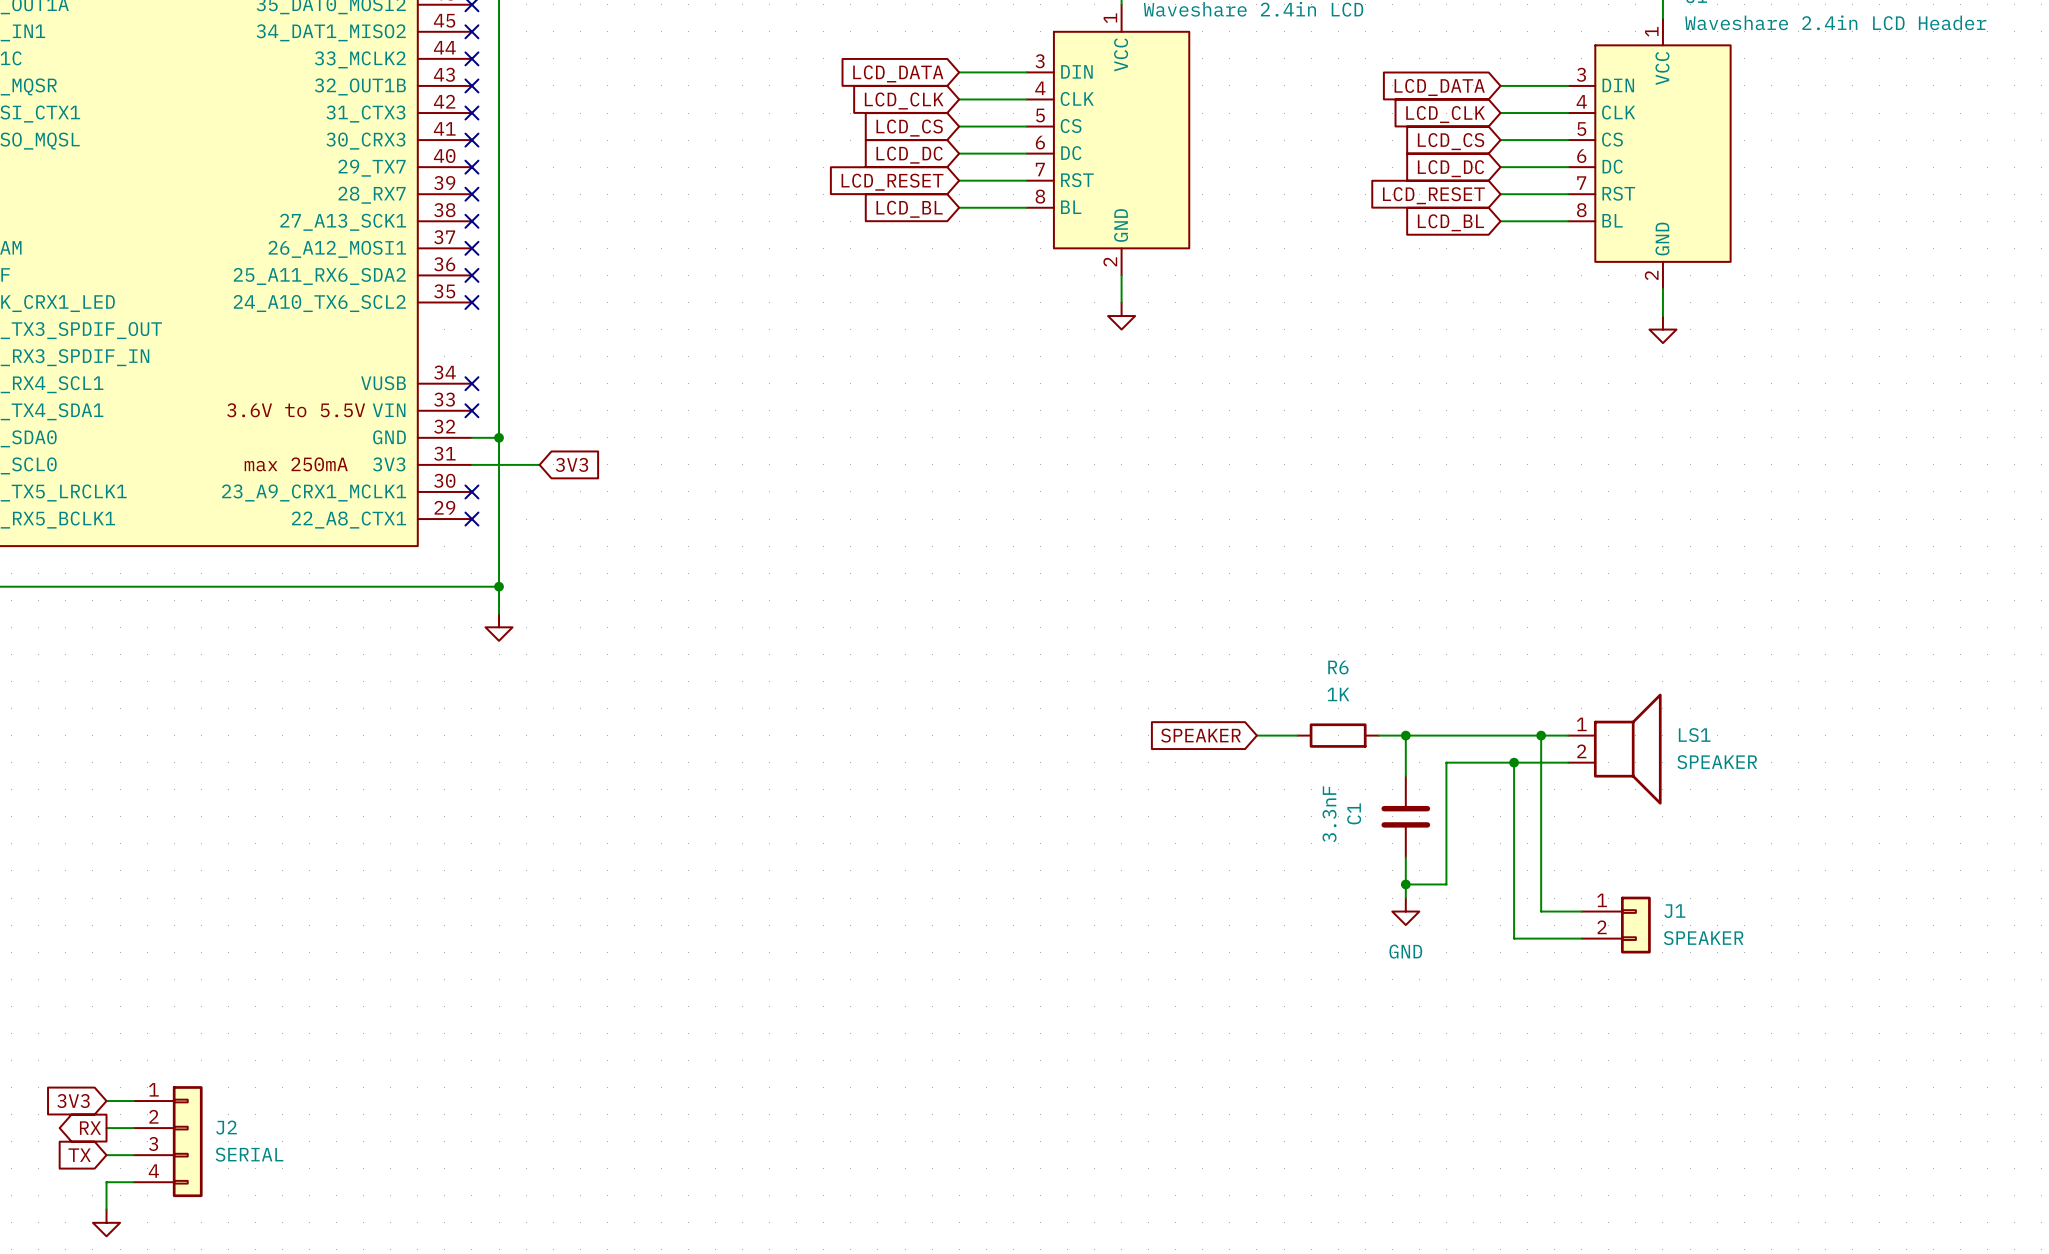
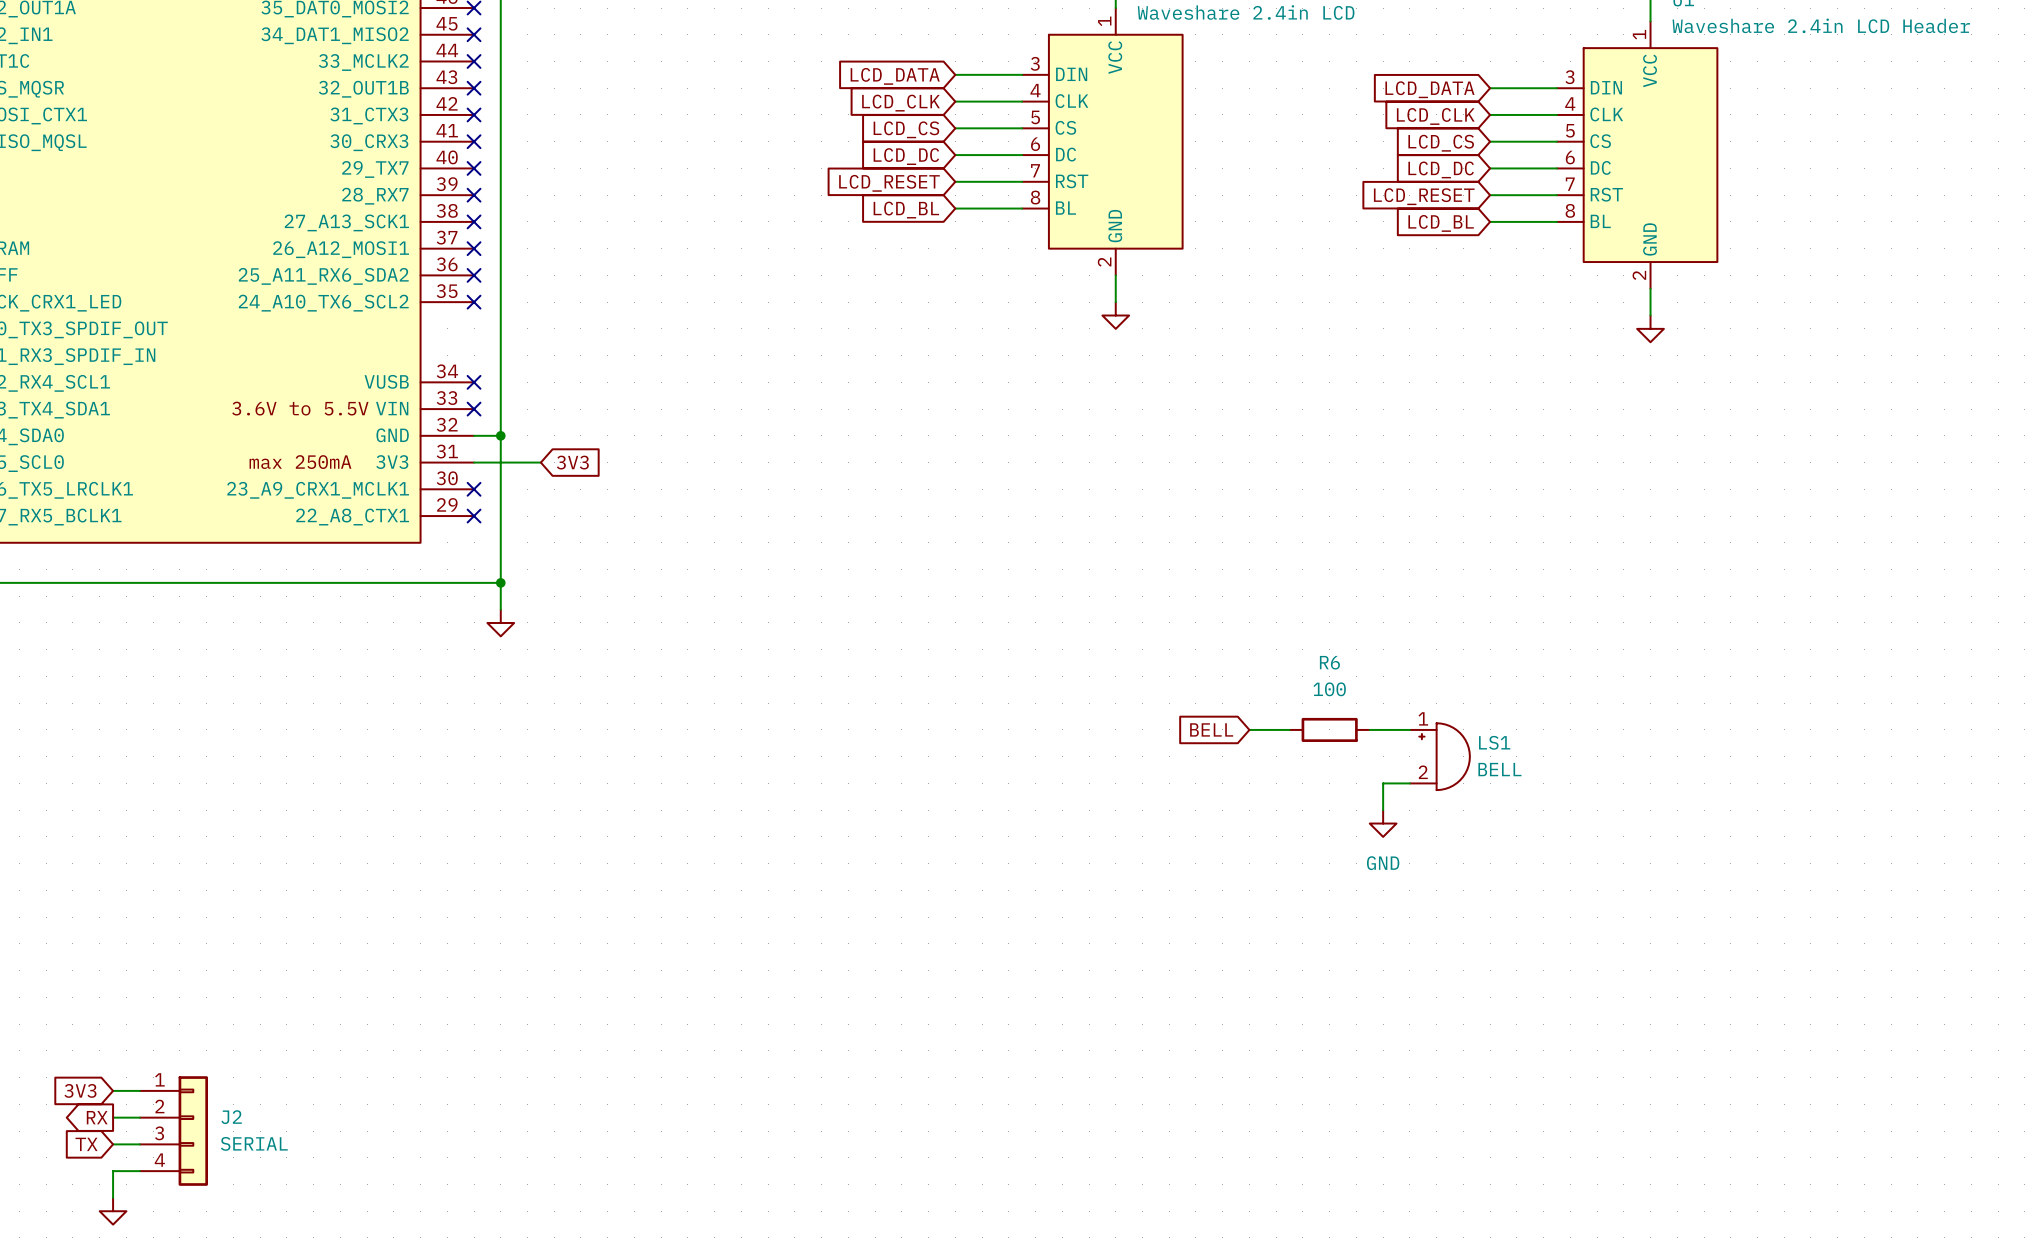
LS1 symbol: [1568, 693, 1662, 805] -> [1409, 723, 1470, 791]
R6 value: 1K (1338, 694) -> 100 (1329, 689)
global label: SPEAKER (1200, 735) -> BELL (1211, 729)
wire: (1405, 735) (1405, 776) -> none
junction: (1405, 735) -> none
wire: (1419, 735) (1568, 735) -> none
wire: (1541, 735) (1541, 911) (1581, 911) -> none
junction: (1541, 735) -> none
LS1 name position: LS1 (1694, 735) -> LS1 (1494, 742)
wire: (1514, 762) (1514, 938) (1581, 938) -> none
junction: (1514, 762) -> none
wire: (1568, 762) (1446, 762) (1446, 884) (1405, 884) -> none
LS1 value: SPEAKER (1717, 762) -> BELL (1499, 769)
wire: none -> (1409, 783) (1383, 783) (1383, 810)
C1: 3.3nF (1405, 816) -> none
wire: (1405, 857) (1405, 898) -> none
junction: (1405, 884) -> none
power symbol position: GND (1405, 911) -> GND (1383, 823)
J1: SPEAKER (1616, 925) -> none

